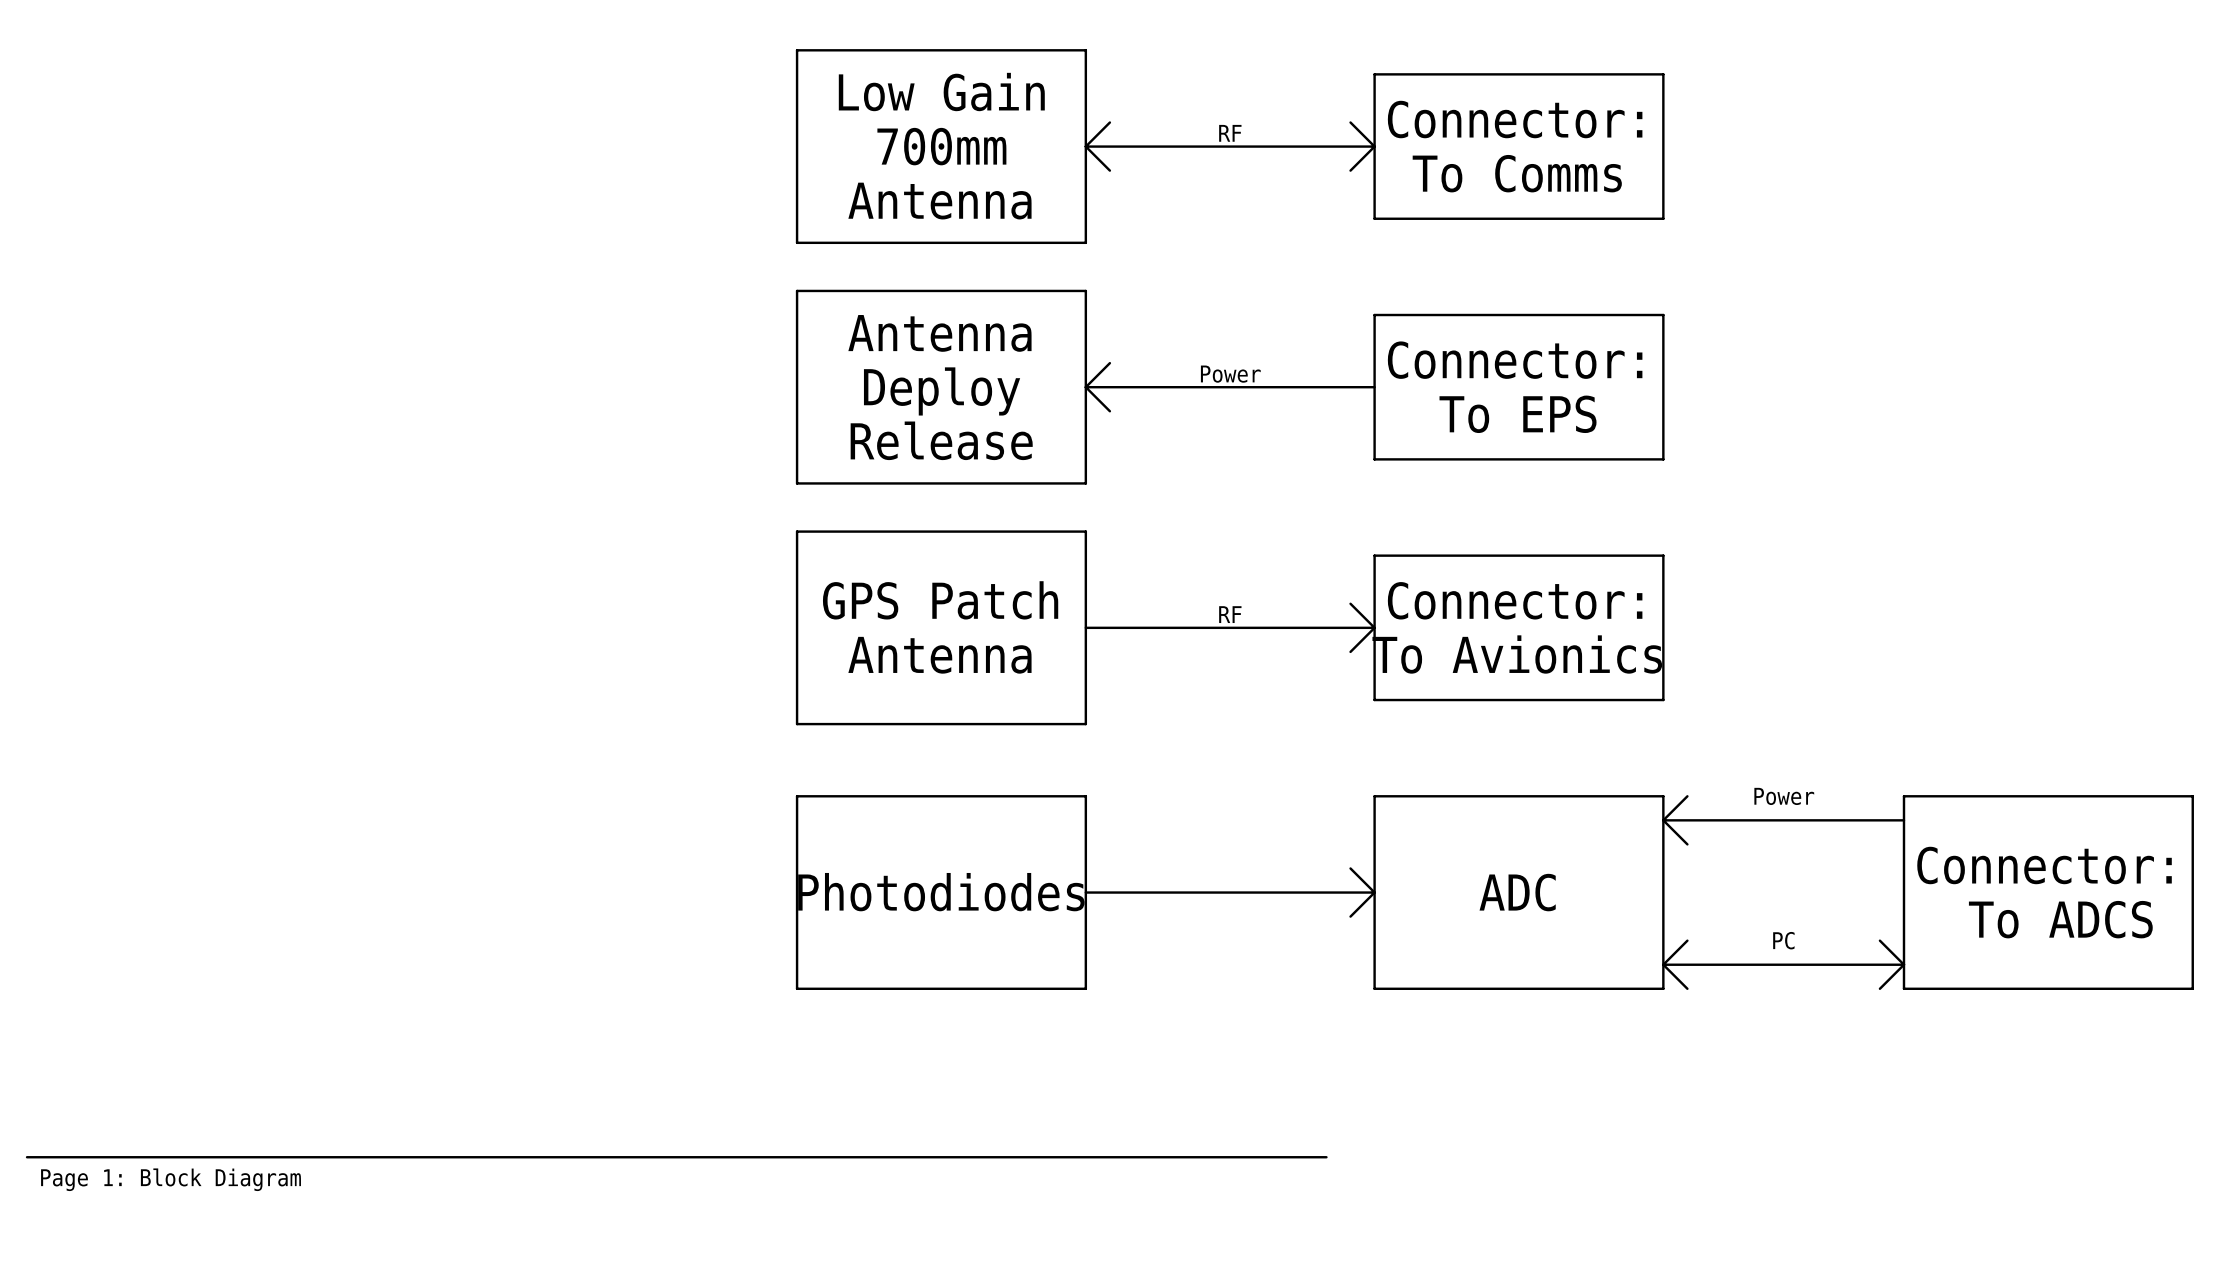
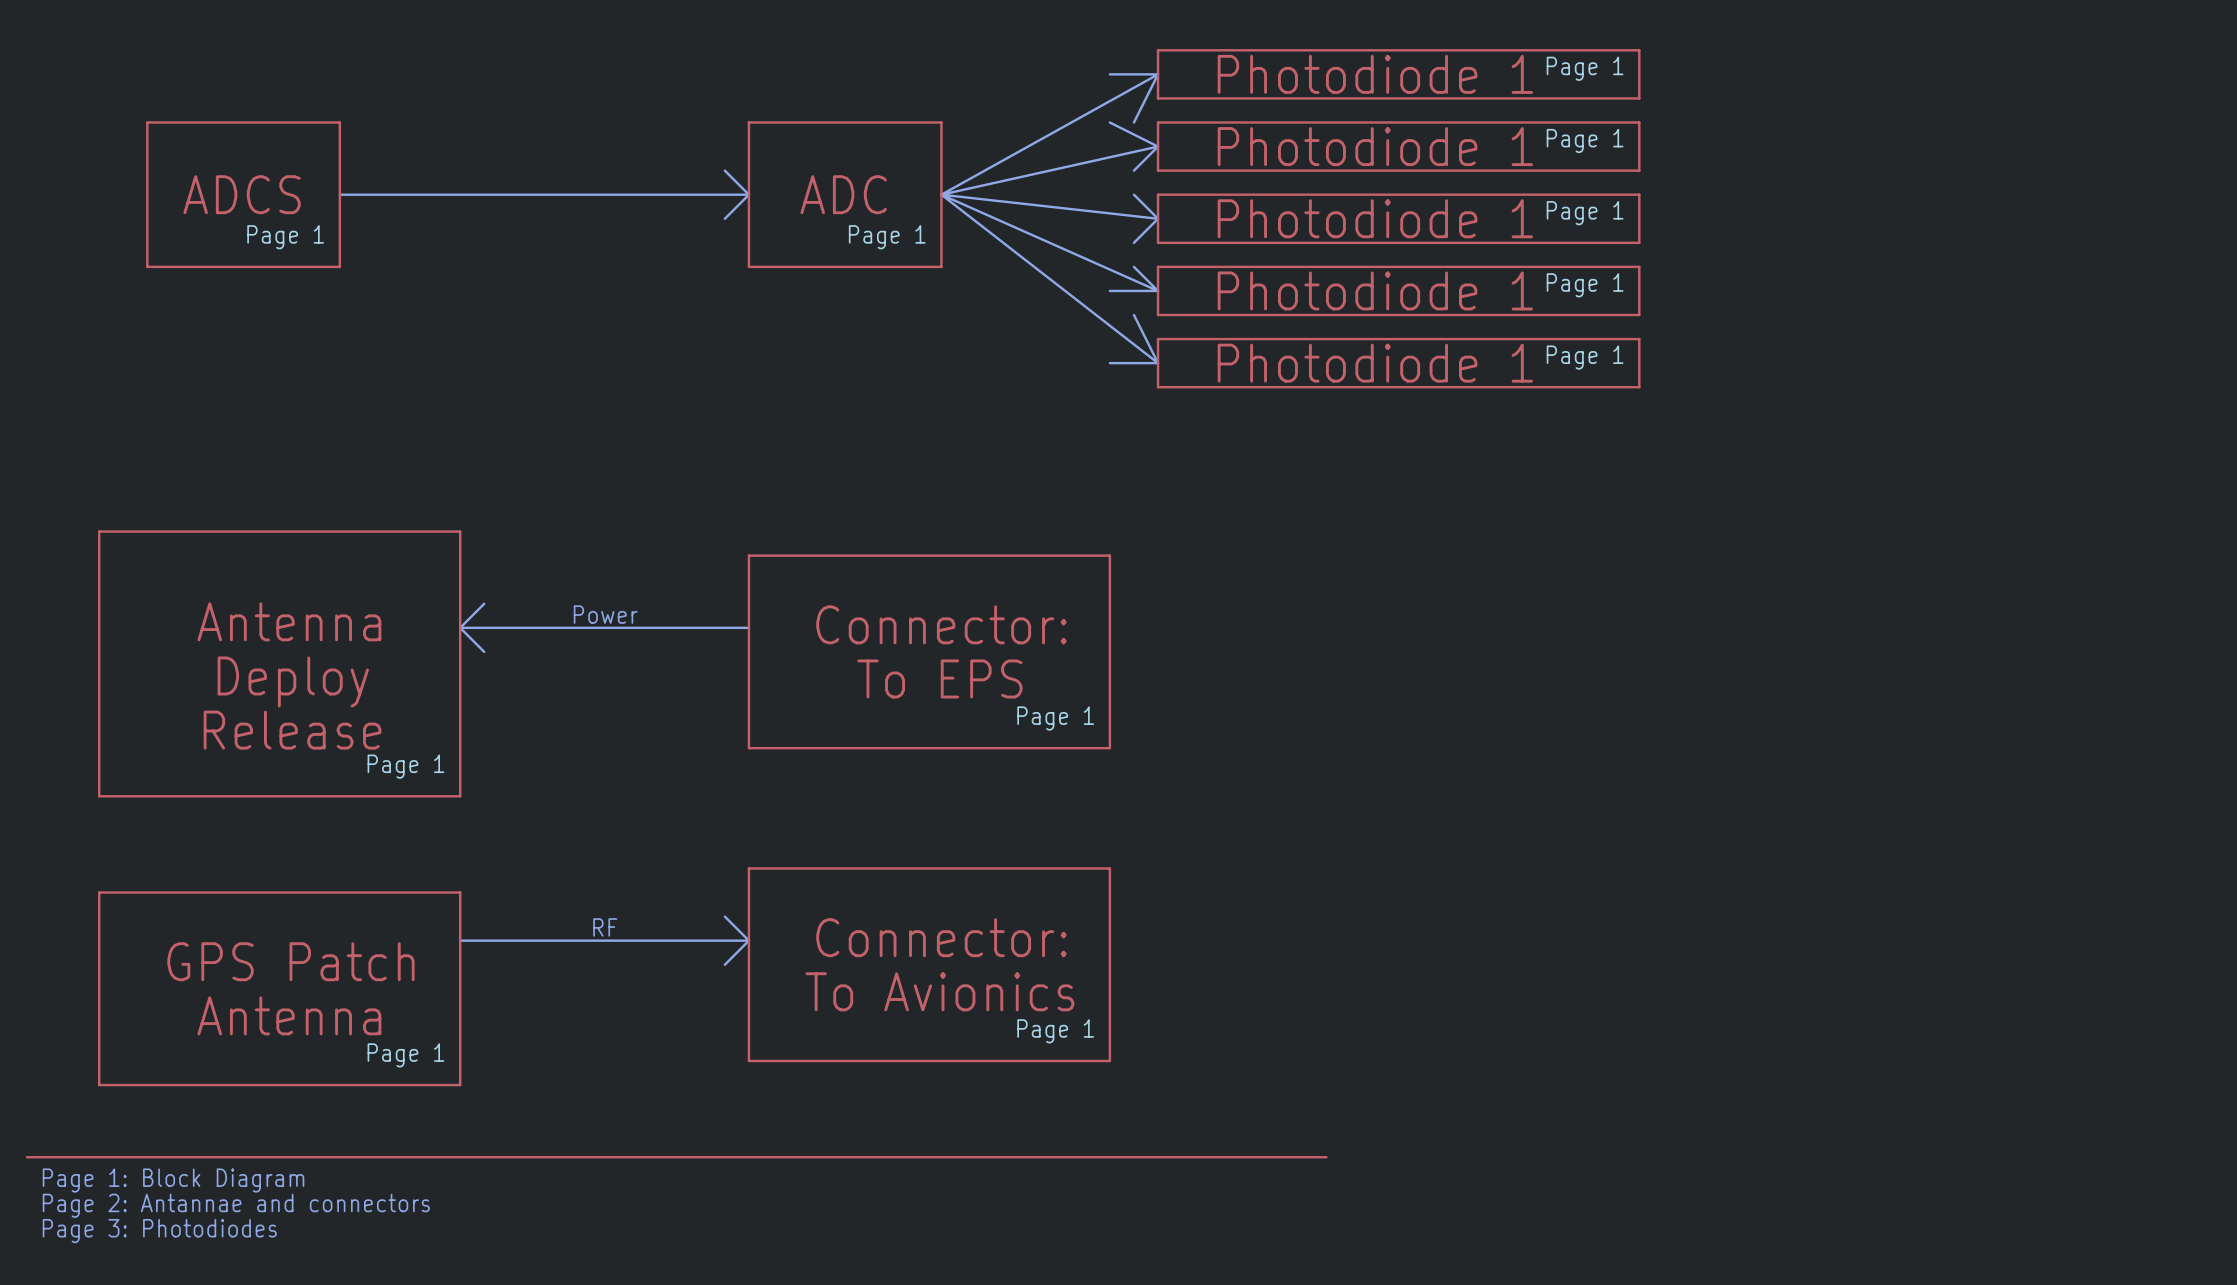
line: (797, 50) (1085, 50) (1085, 242) (797, 242) (797, 50) -> none
line: none -> (1158, 50) (1639, 50) (1639, 98) (1158, 98) (1158, 50)
text: none -> Page 1 (1585, 68)
text: none -> Photodiode 1 (1375, 74)
line: none -> (1109, 74) (1158, 74)
line: none -> (1158, 74) (941, 194)
line: none -> (1158, 74) (1133, 122)
line: (1374, 74) (1663, 74) (1663, 218) (1374, 218) (1374, 74) -> none
text: Low Gain (941, 92) -> none
text: Connector: (1515, 119) -> none
line: none -> (147, 122) (339, 122) (339, 266) (147, 266) (147, 122)
line: none -> (748, 122) (748, 266) (941, 266) (941, 122) (748, 122)
line: (1109, 122) (1085, 146) -> (1109, 122) (1158, 146)
line: none -> (1158, 122) (1639, 122) (1639, 170) (1158, 170) (1158, 122)
line: (1350, 122) (1374, 146) -> (1133, 194) (1158, 218)
text: RF (1230, 133) -> none
text: none -> Page 1 (1585, 140)
text: 700mm (941, 146) -> none
line: (1085, 146) (1374, 146) -> none
line: (1085, 146) (1109, 170) -> none
line: none -> (1158, 146) (941, 194)
line: none -> (1158, 146) (1133, 170)
line: (1374, 146) (1350, 170) -> (1158, 218) (1133, 242)
text: none -> Photodiode 1 (1375, 146)
line: none -> (724, 170) (748, 194)
text: To Comms (1517, 173) -> none
text: none -> ADCS (242, 194)
line: none -> (339, 194) (748, 194)
line: none -> (748, 194) (724, 218)
text: none -> ADC (843, 194)
line: none -> (941, 194) (1158, 218)
line: none -> (941, 194) (1158, 290)
line: none -> (941, 194) (1158, 363)
line: none -> (1158, 194) (1158, 242) (1639, 242) (1639, 194) (1158, 194)
text: Antenna (939, 201) -> none
text: none -> Page 1 (1585, 213)
text: none -> Photodiode 1 (1375, 218)
text: none -> Page 1 (285, 237)
text: none -> Page 1 (887, 237)
text: none -> Page 1 (1585, 285)
line: (797, 290) (797, 483) (1085, 483) (1085, 290) (797, 290) -> none
line: none -> (1109, 290) (1158, 290)
text: none -> Photodiode 1 (1375, 290)
line: none -> (1133, 315) (1158, 363)
line: (1374, 315) (1374, 459) (1663, 459) (1663, 315) (1639, 315) -> (1374, 315) (1158, 315) (1158, 266) (1639, 266) (1639, 315)
text: Antenna (939, 333) -> none
line: none -> (1158, 339) (1158, 387) (1639, 387) (1639, 339) (1158, 339)
text: none -> Page 1 (1585, 357)
text: Connector: (1515, 360) -> none
text: none -> Photodiode 1 (1375, 363)
line: (1109, 363) (1085, 387) -> (1109, 363) (1158, 363)
text: Power (1230, 374) -> none
line: (1085, 387) (1109, 411) -> (1133, 266) (1158, 290)
line: (1085, 387) (1374, 387) -> none
text: Deploy (942, 391) -> none
text: To EPS (1518, 414) -> none
text: Release (941, 440) -> none
line: none -> (99, 531) (99, 796) (460, 796) (460, 531) (99, 531)
line: (797, 531) (797, 724) (1085, 724) (1085, 531) (797, 531) -> (748, 555) (748, 748) (1109, 748) (1109, 555) (748, 555)
line: (1374, 555) (1374, 700) (1663, 700) (1663, 555) (1374, 555) -> none
text: GPS Patch (940, 600) -> none
text: Connector: (1515, 600) -> none
line: none -> (484, 603) (460, 627)
line: (1350, 603) (1374, 627) -> none
text: none -> Power (605, 614)
text: RF (1230, 614) -> none
text: none -> Antenna (289, 621)
text: none -> Connector: (941, 624)
line: none -> (460, 627) (748, 627)
line: none -> (460, 627) (484, 651)
line: (1085, 627) (1374, 627) -> none
line: (1374, 627) (1350, 651) -> none
text: To Avionics (1517, 654) -> none
text: Antenna (939, 655) -> none
text: none -> To EPS (939, 678)
text: none -> Deploy (293, 681)
text: none -> Page 1 (1055, 718)
text: none -> Release (292, 730)
text: none -> Page 1 (405, 766)
line: (797, 796) (797, 988) (1085, 988) (1085, 796) (797, 796) -> none
line: (1374, 796) (1374, 988) (1663, 988) (1663, 796) (1374, 796) -> none
line: (1687, 796) (1663, 820) -> none
text: Power (1784, 796) -> none
line: (1903, 796) (2192, 796) (2192, 988) (1903, 988) (1903, 796) -> none
line: (1663, 820) (1903, 820) -> none
line: (1663, 820) (1687, 844) -> none
text: Connector: (2044, 865) -> none
line: none -> (748, 868) (748, 1060) (1109, 1060) (1109, 868) (748, 868)
line: (1350, 868) (1374, 892) -> none
line: none -> (99, 892) (460, 892) (460, 1085) (99, 1085) (99, 892)
text: Photodiodes (941, 892) -> none
line: (1085, 892) (1374, 892) -> none
line: (1374, 892) (1350, 916) -> none
text: ADC (1517, 892) -> none
line: none -> (724, 916) (748, 940)
text: To ADCS (2060, 919) -> none
text: none -> RF (605, 927)
text: none -> Connector: (941, 937)
line: none -> (460, 940) (748, 940)
line: none -> (748, 940) (724, 964)
line: (1687, 940) (1663, 964) -> none
text: PC (1783, 940) -> none
line: (1879, 940) (1903, 964) -> none
text: none -> GPS Patch (290, 961)
line: (1663, 964) (1687, 988) -> none
line: (1663, 964) (1903, 964) -> none
line: (1903, 964) (1879, 988) -> none
text: none -> To Avionics (939, 991)
text: none -> Antenna (289, 1015)
text: none -> Page 1 (1055, 1031)
text: none -> Page 1 (405, 1055)
text: none -> Page 2: Antannae and connectors (236, 1205)
text: none -> Page 3: Photodiodes (159, 1231)

